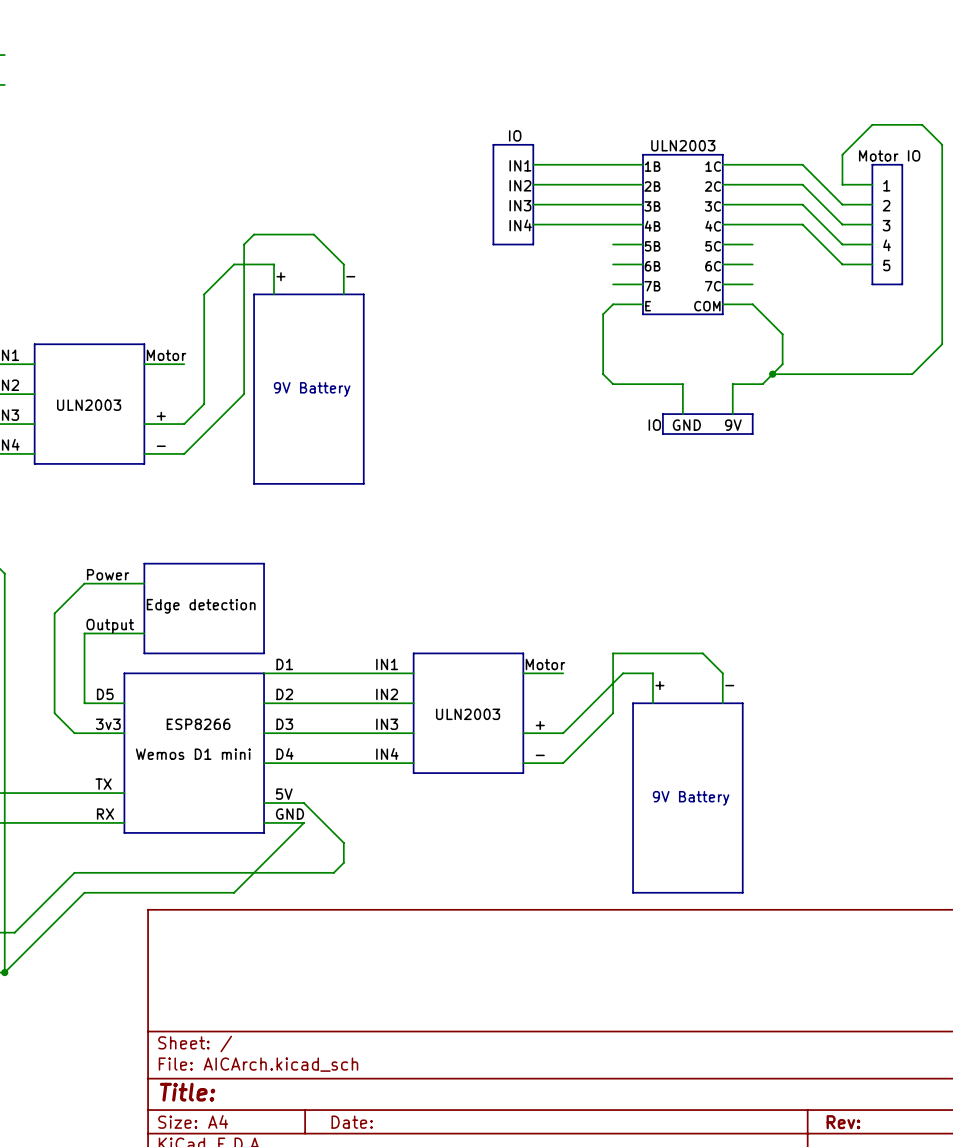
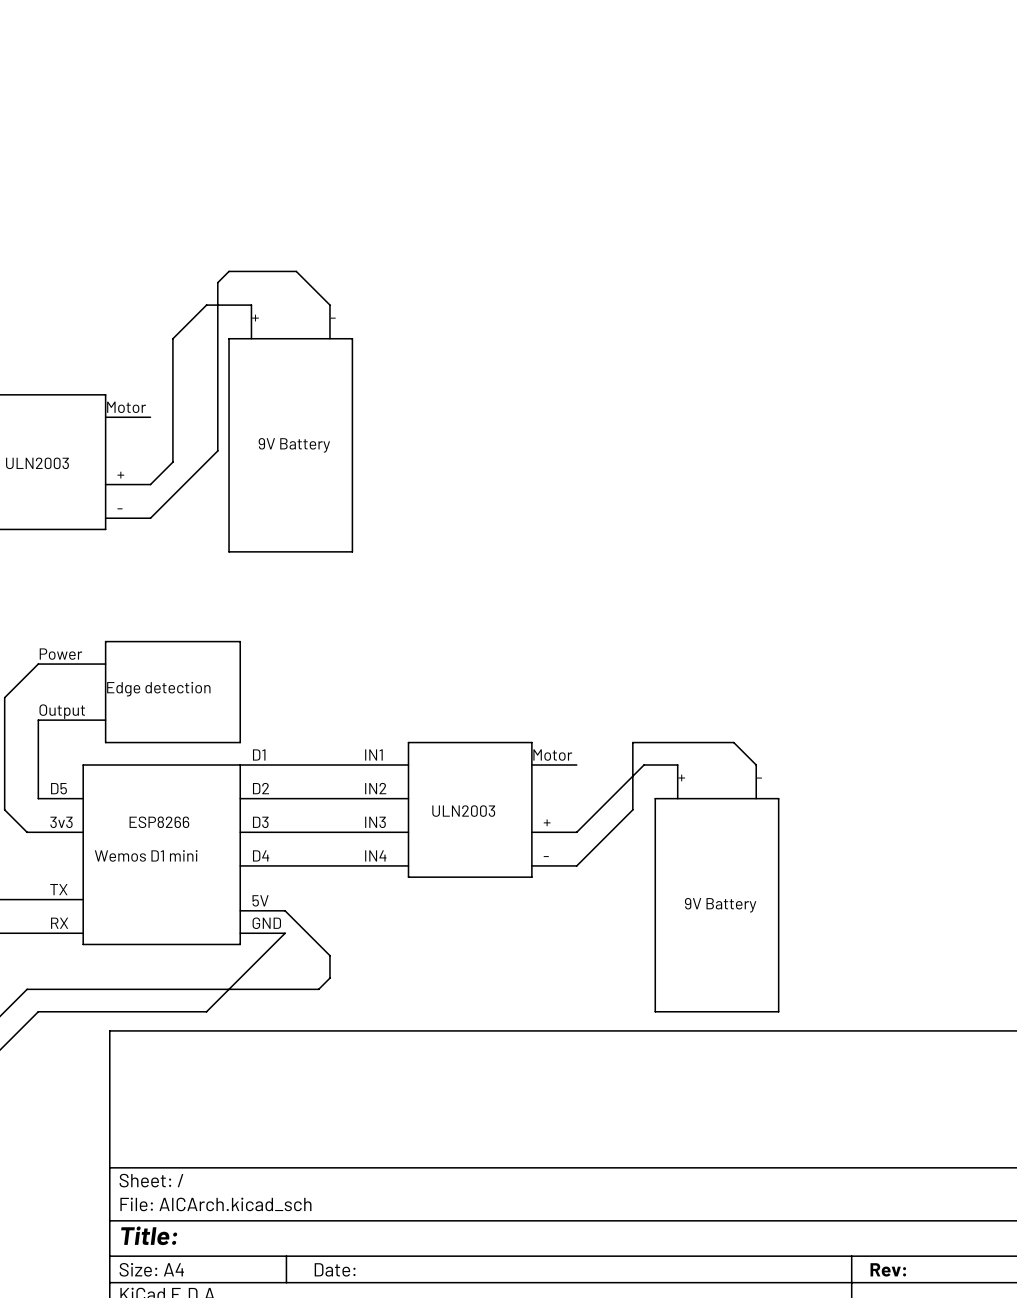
label: IO (515, 135) -> none
line: (493, 144) (533, 144) (533, 244) (493, 244) (493, 144) -> none
label: ULN2003 (683, 145) -> none
line: (643, 154) (722, 154) (722, 314) (643, 314) (643, 154) -> none
label: Motor IO (889, 155) -> none
wire: (533, 164) (643, 164) -> none
wire: (722, 164) (802, 164) (842, 204) (872, 204) -> none
line: (872, 164) (902, 164) (902, 284) (872, 284) (872, 164) -> none
label: IN1 (520, 165) -> none
label: 1B (652, 166) -> none
label: 1C (713, 166) -> none
wire: (533, 184) (643, 184) -> none
wire: (722, 184) (802, 184) (842, 224) (872, 224) -> none
wire: (872, 184) (842, 184) (842, 154) (872, 124) (922, 124) (942, 144) (942, 344) (912, 374) (772, 374) -> none
label: IN2 (520, 185) -> none
label: 1 (886, 185) -> none
label: 2B (652, 186) -> none
label: 2C (712, 186) -> none
wire: (533, 204) (643, 204) -> none
wire: (722, 204) (802, 204) (842, 244) (872, 244) -> none
label: IN3 (520, 205) -> none
label: 2 (886, 205) -> none
label: 3B (652, 206) -> none
label: 3C (712, 206) -> none
wire: (533, 224) (643, 224) -> none
wire: (722, 224) (802, 224) (842, 264) (872, 264) -> none
label: IN4 (520, 225) -> none
label: 3 (886, 225) -> none
label: 4B (652, 226) -> none
label: 4C (713, 226) -> none
wire: (613, 244) (643, 244) -> none
wire: (722, 244) (752, 244) -> none
label: 4 (887, 245) -> none
label: 5B (652, 246) -> none
label: 5C (713, 246) -> none
wire: (613, 264) (643, 264) -> none
wire: (722, 264) (752, 264) -> none
label: 5 (886, 265) -> none
label: 6B (652, 266) -> none
label: 6C (713, 266) -> none
wire: (613, 284) (643, 284) -> none
wire: (722, 284) (752, 284) -> none
label: 7B (652, 286) -> none
label: 7C (712, 286) -> none
wire: (643, 304) (613, 304) (603, 314) (603, 374) (613, 384) (682, 384) (682, 414) -> none
wire: (722, 304) (752, 304) (782, 334) (782, 364) (762, 384) (732, 384) (732, 414) -> none
label: E (648, 306) -> none
label: COM (707, 306) -> none
junction: (772, 374) -> none
line: (662, 414) (752, 414) (752, 434) (662, 434) (662, 414) -> none
label: IO (654, 425) -> none
label: GND (686, 425) -> none
label: 9V (733, 425) -> none

